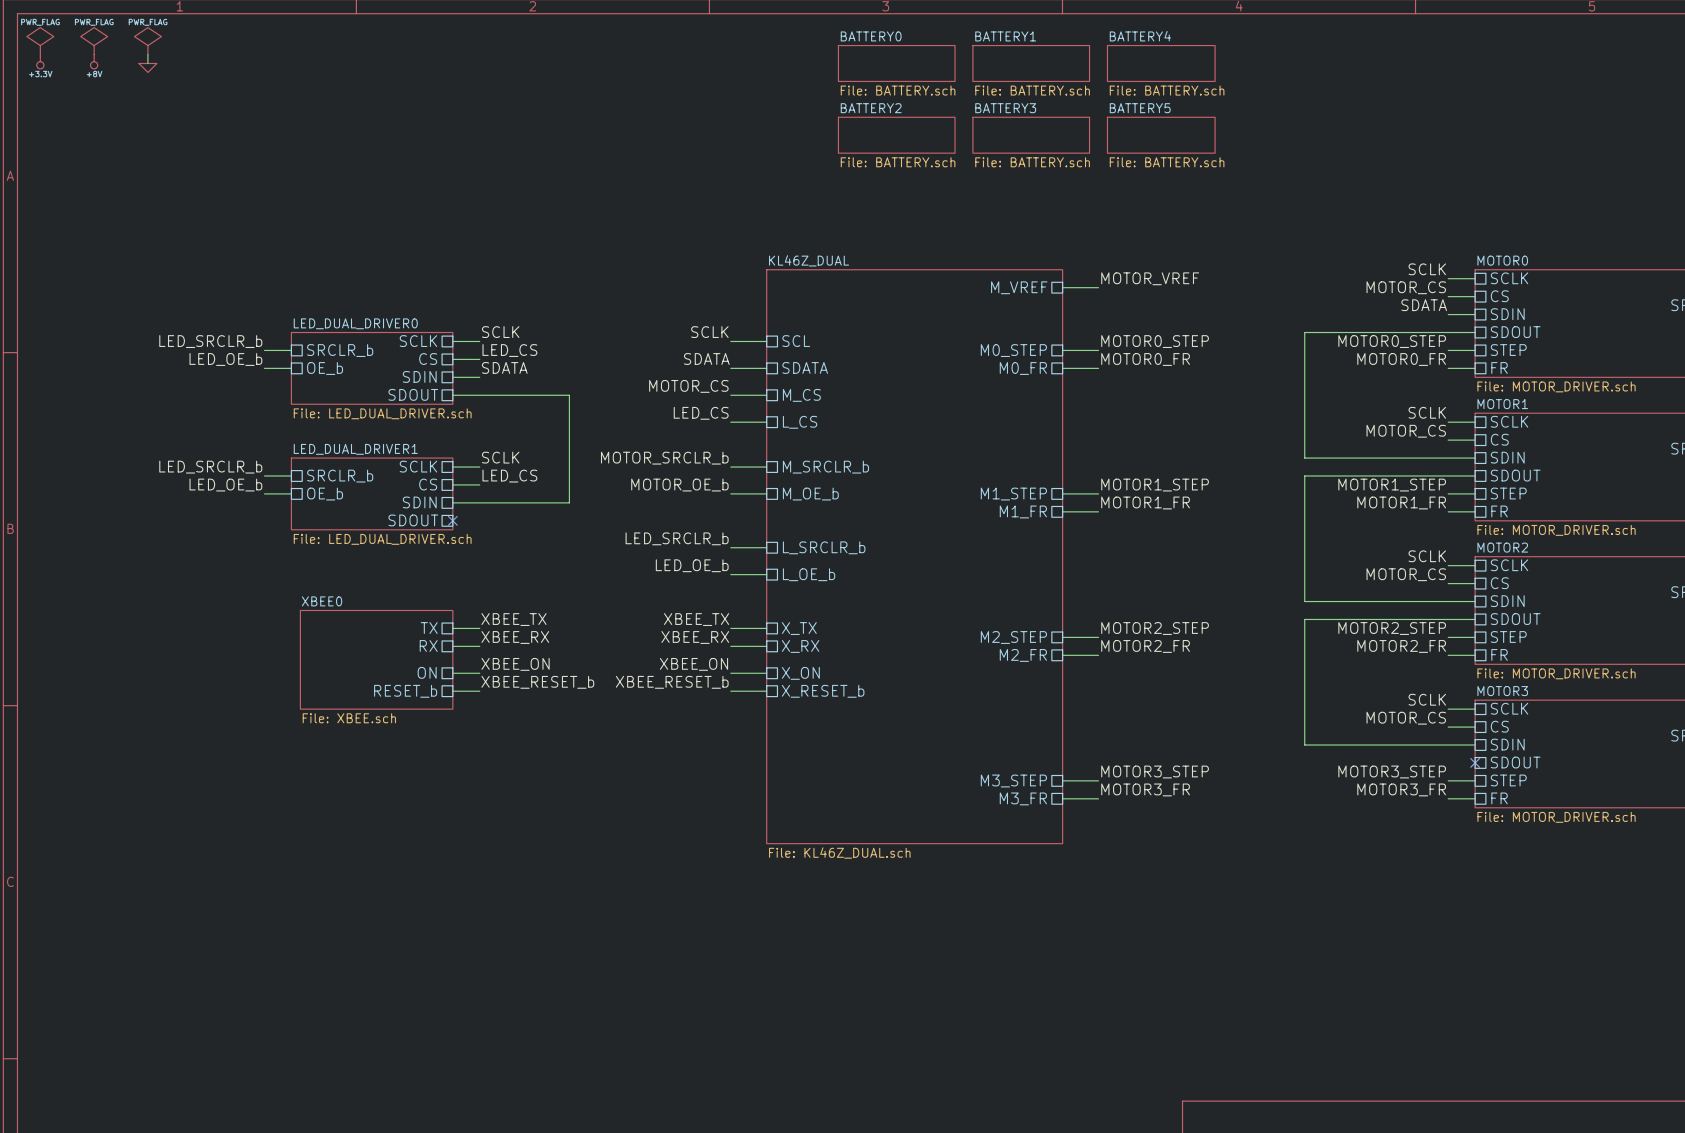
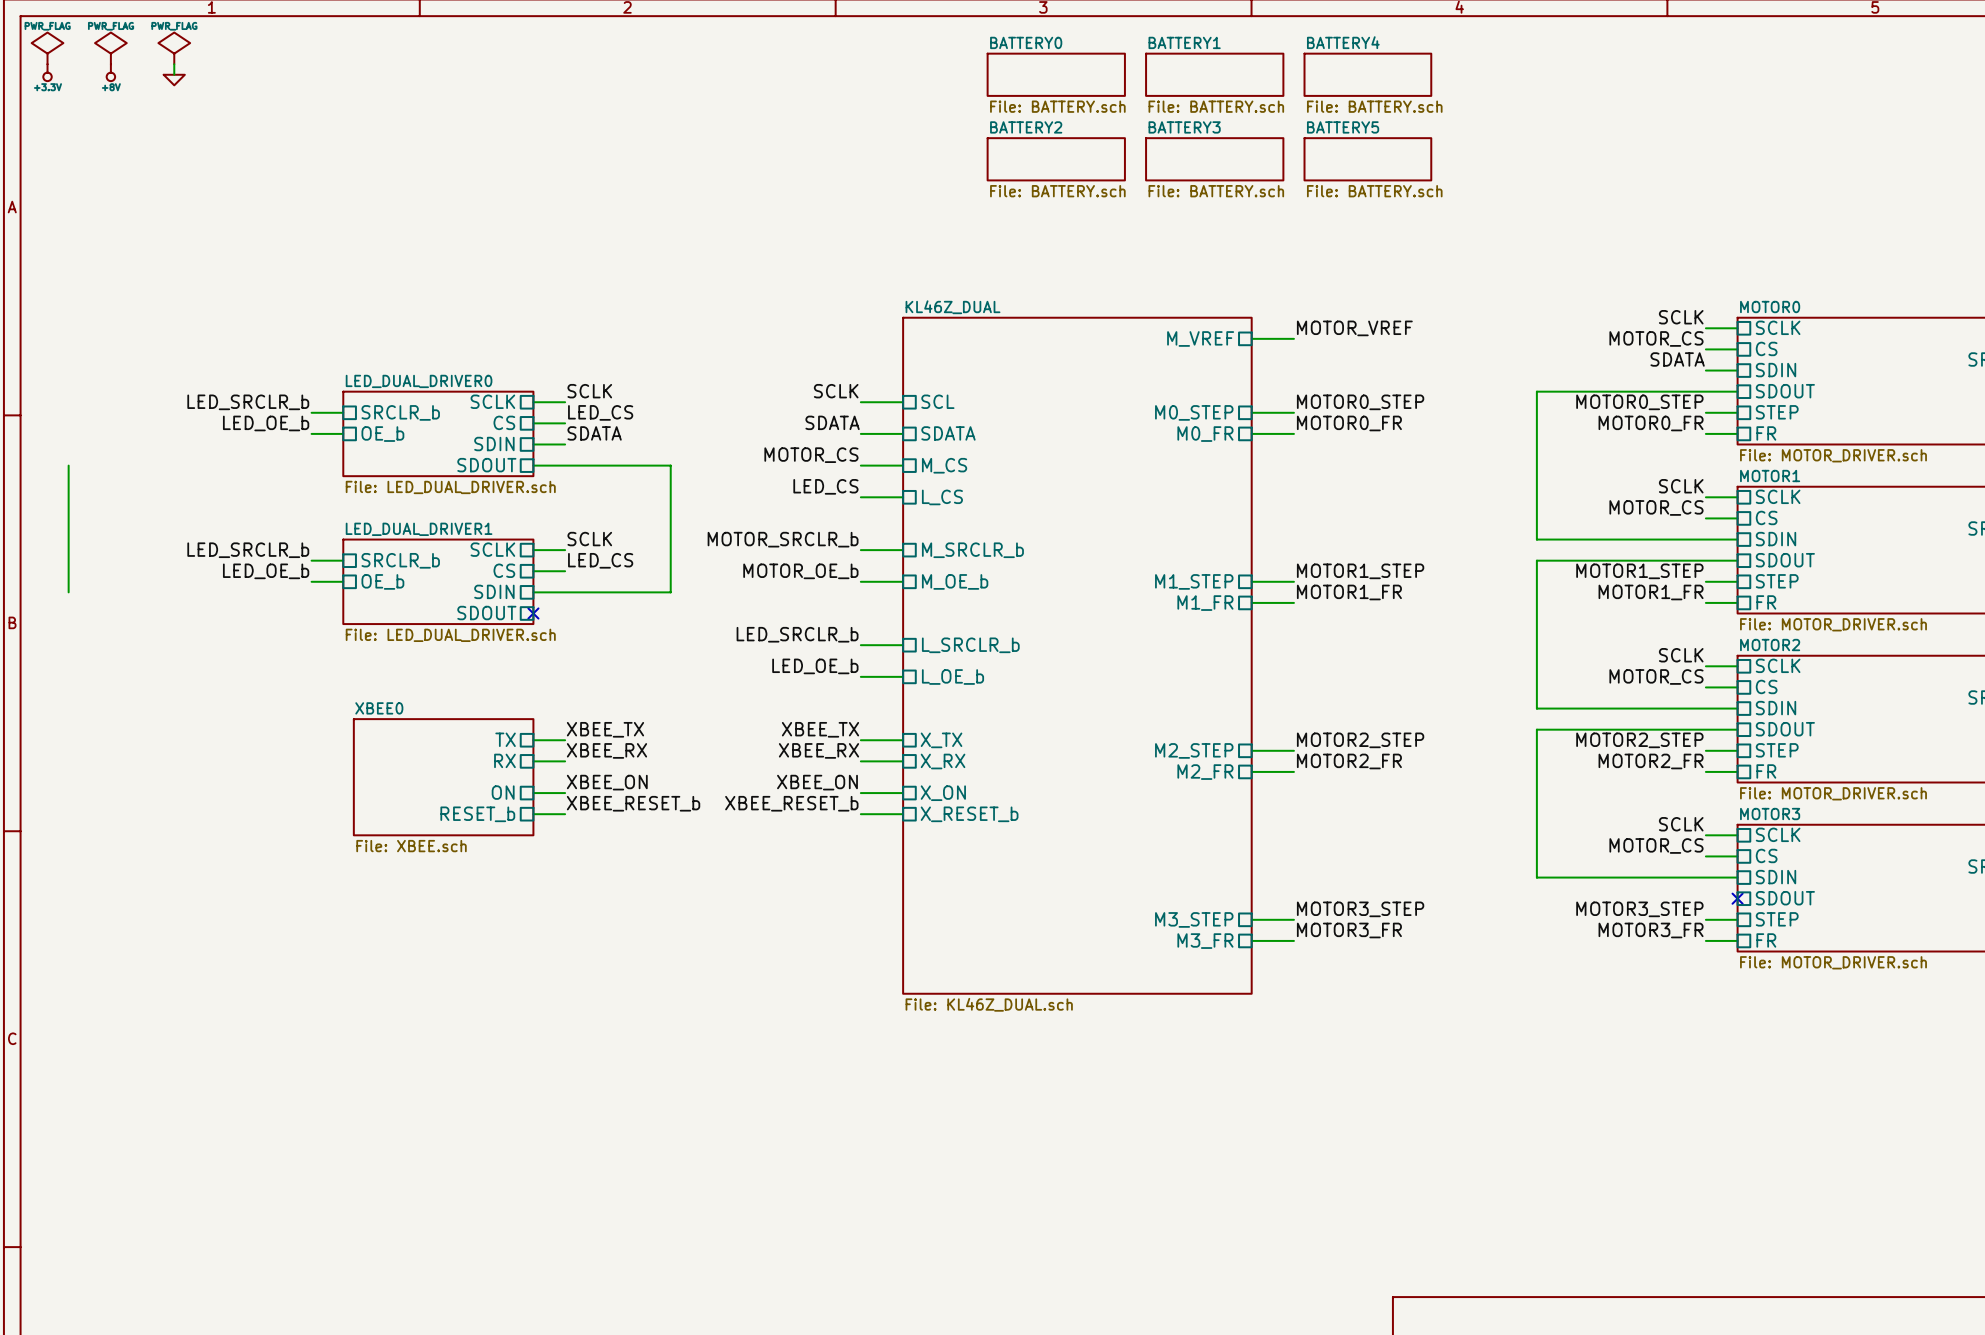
wire: none -> (68, 465) (68, 592)

